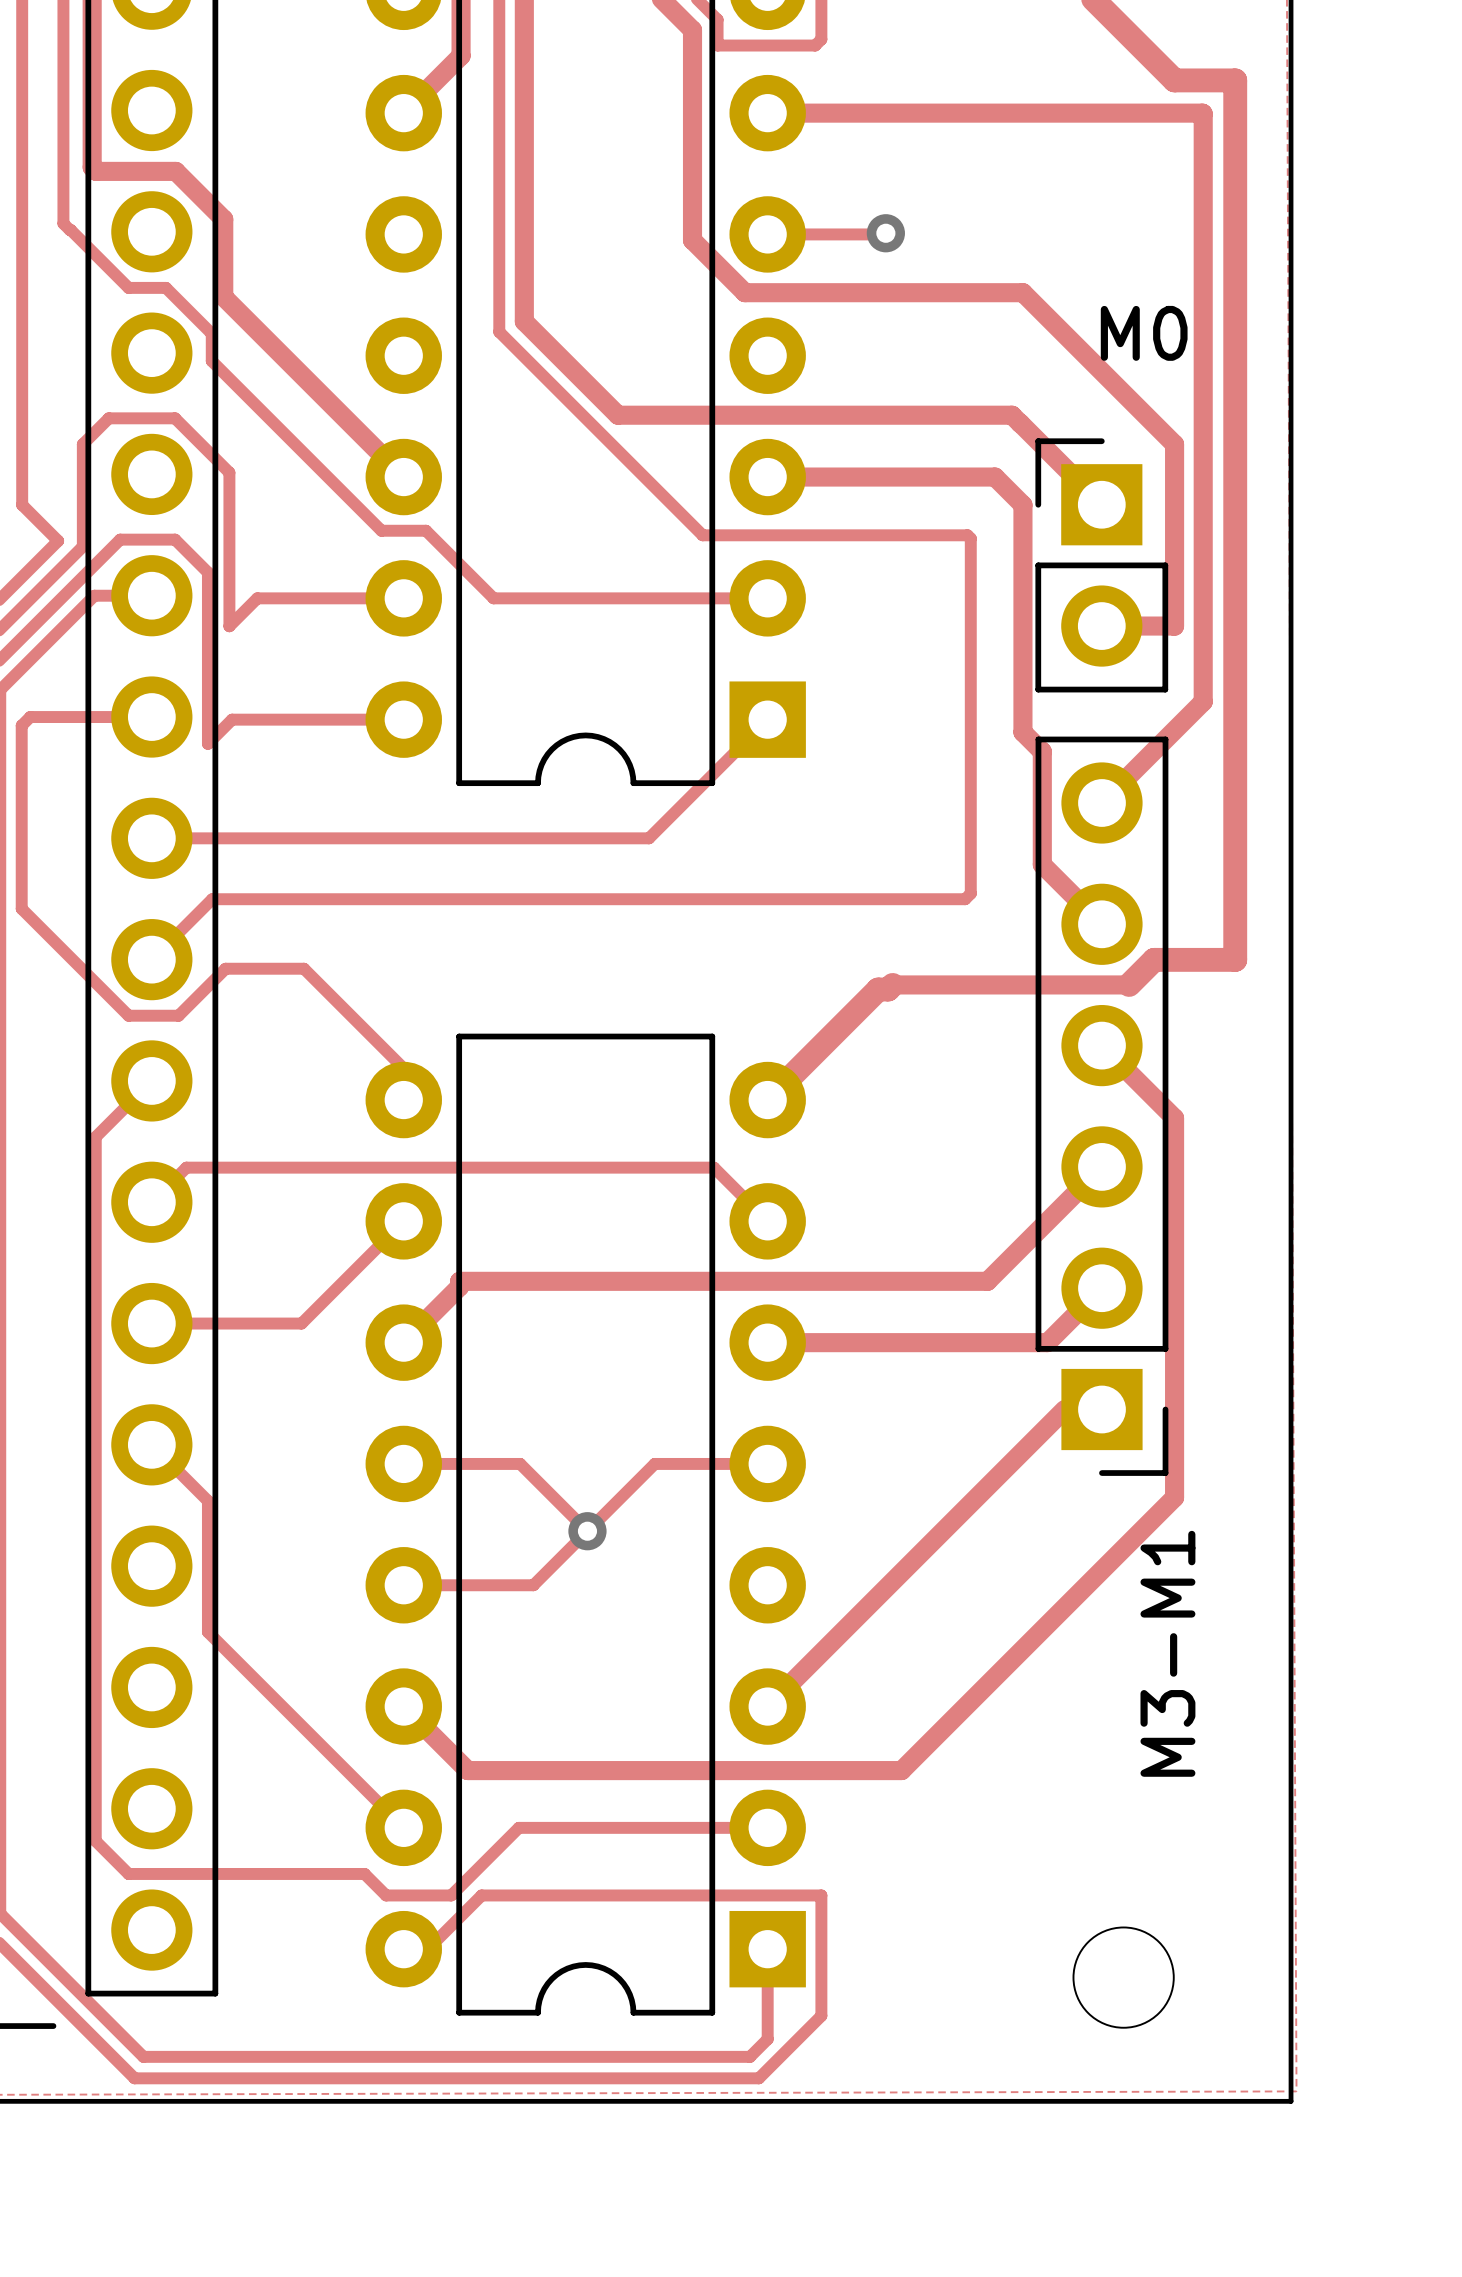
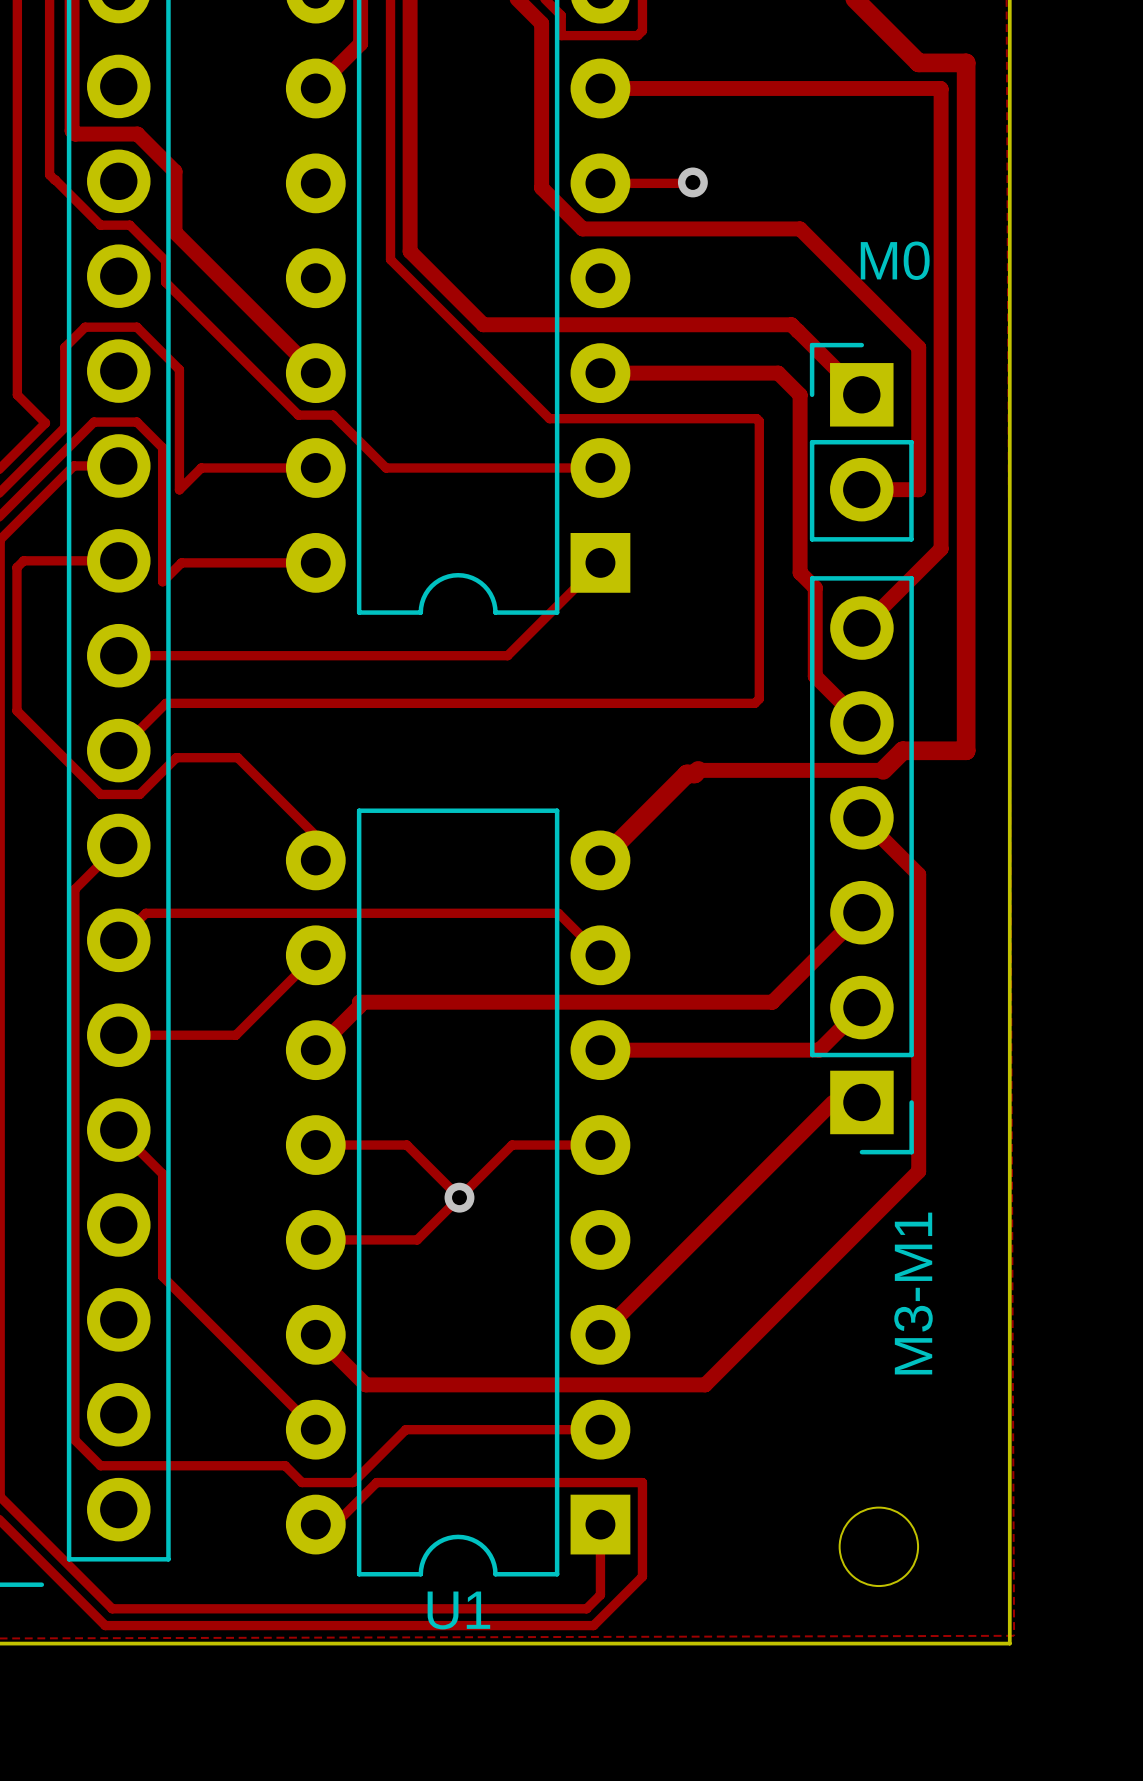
U1 name: none -> U1 (458, 1610)

